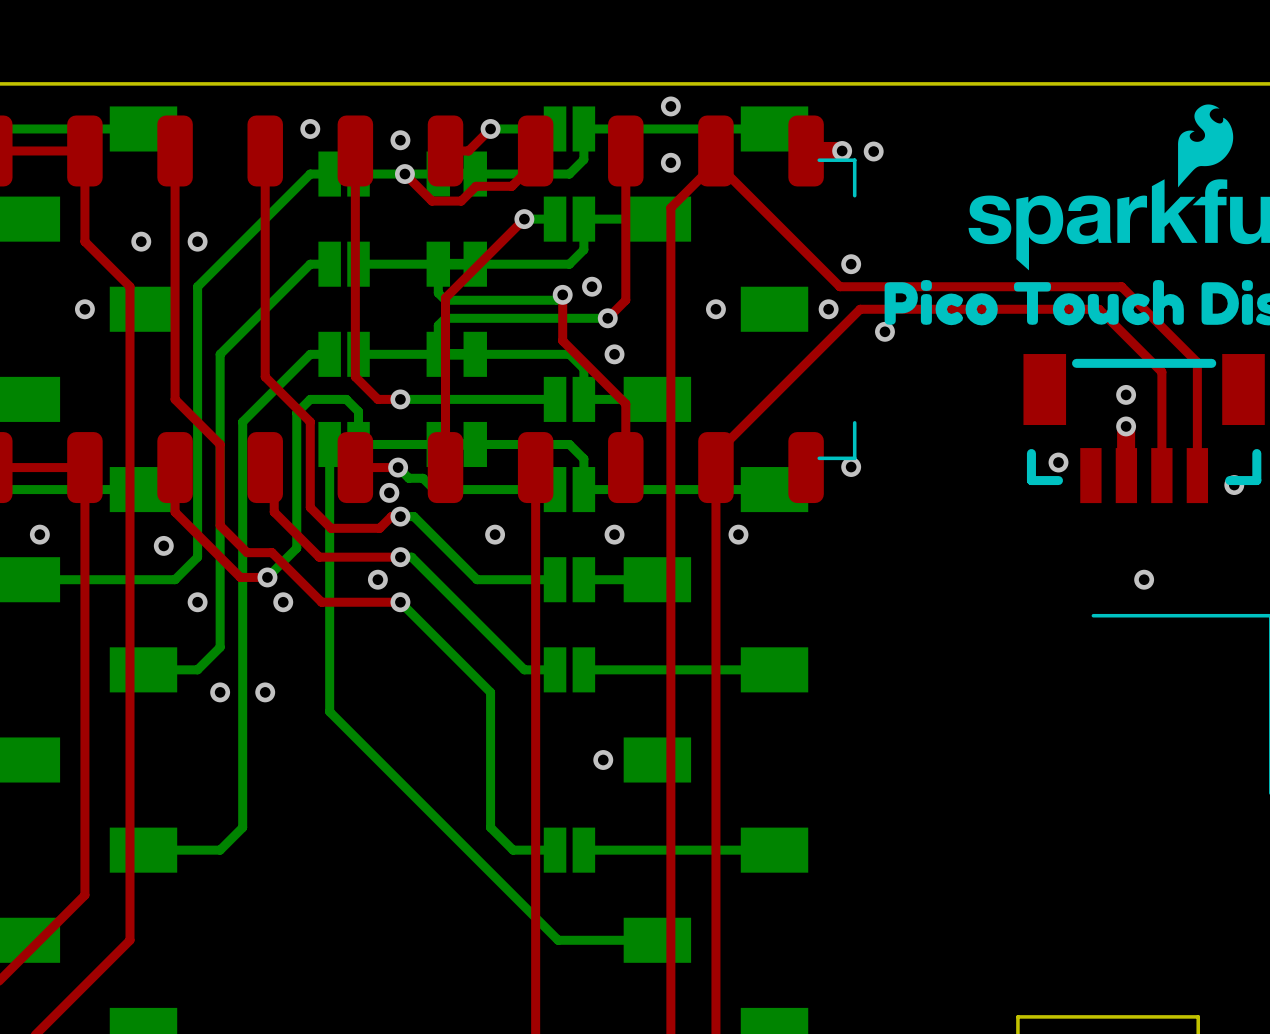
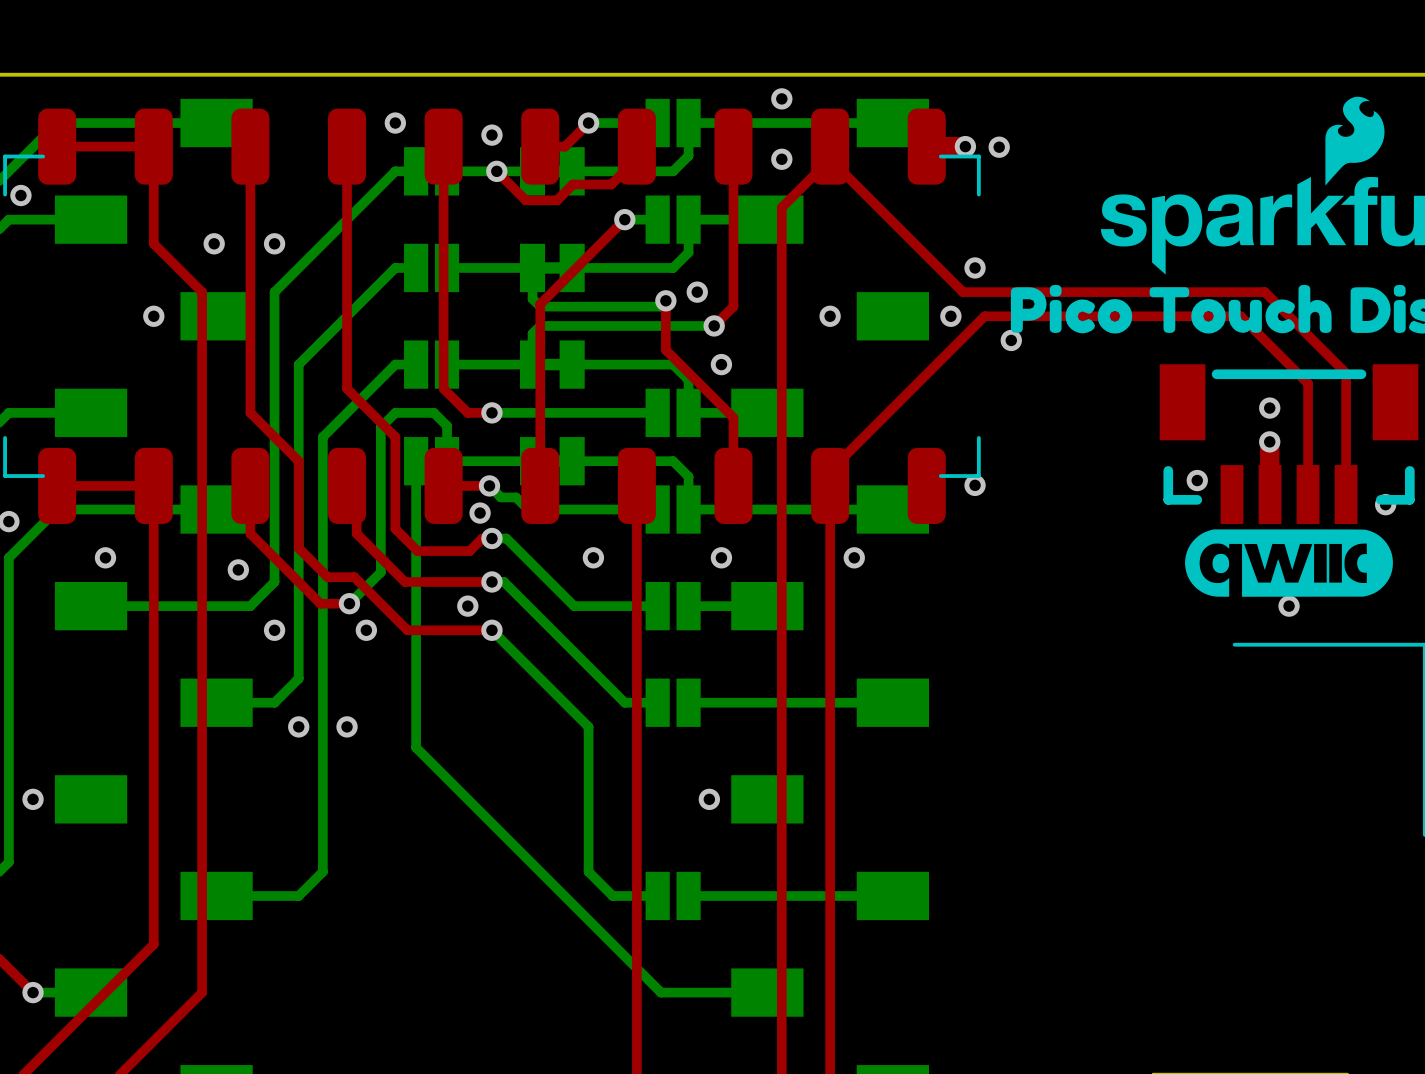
drawing: none -> [1185, 529, 1393, 597]

